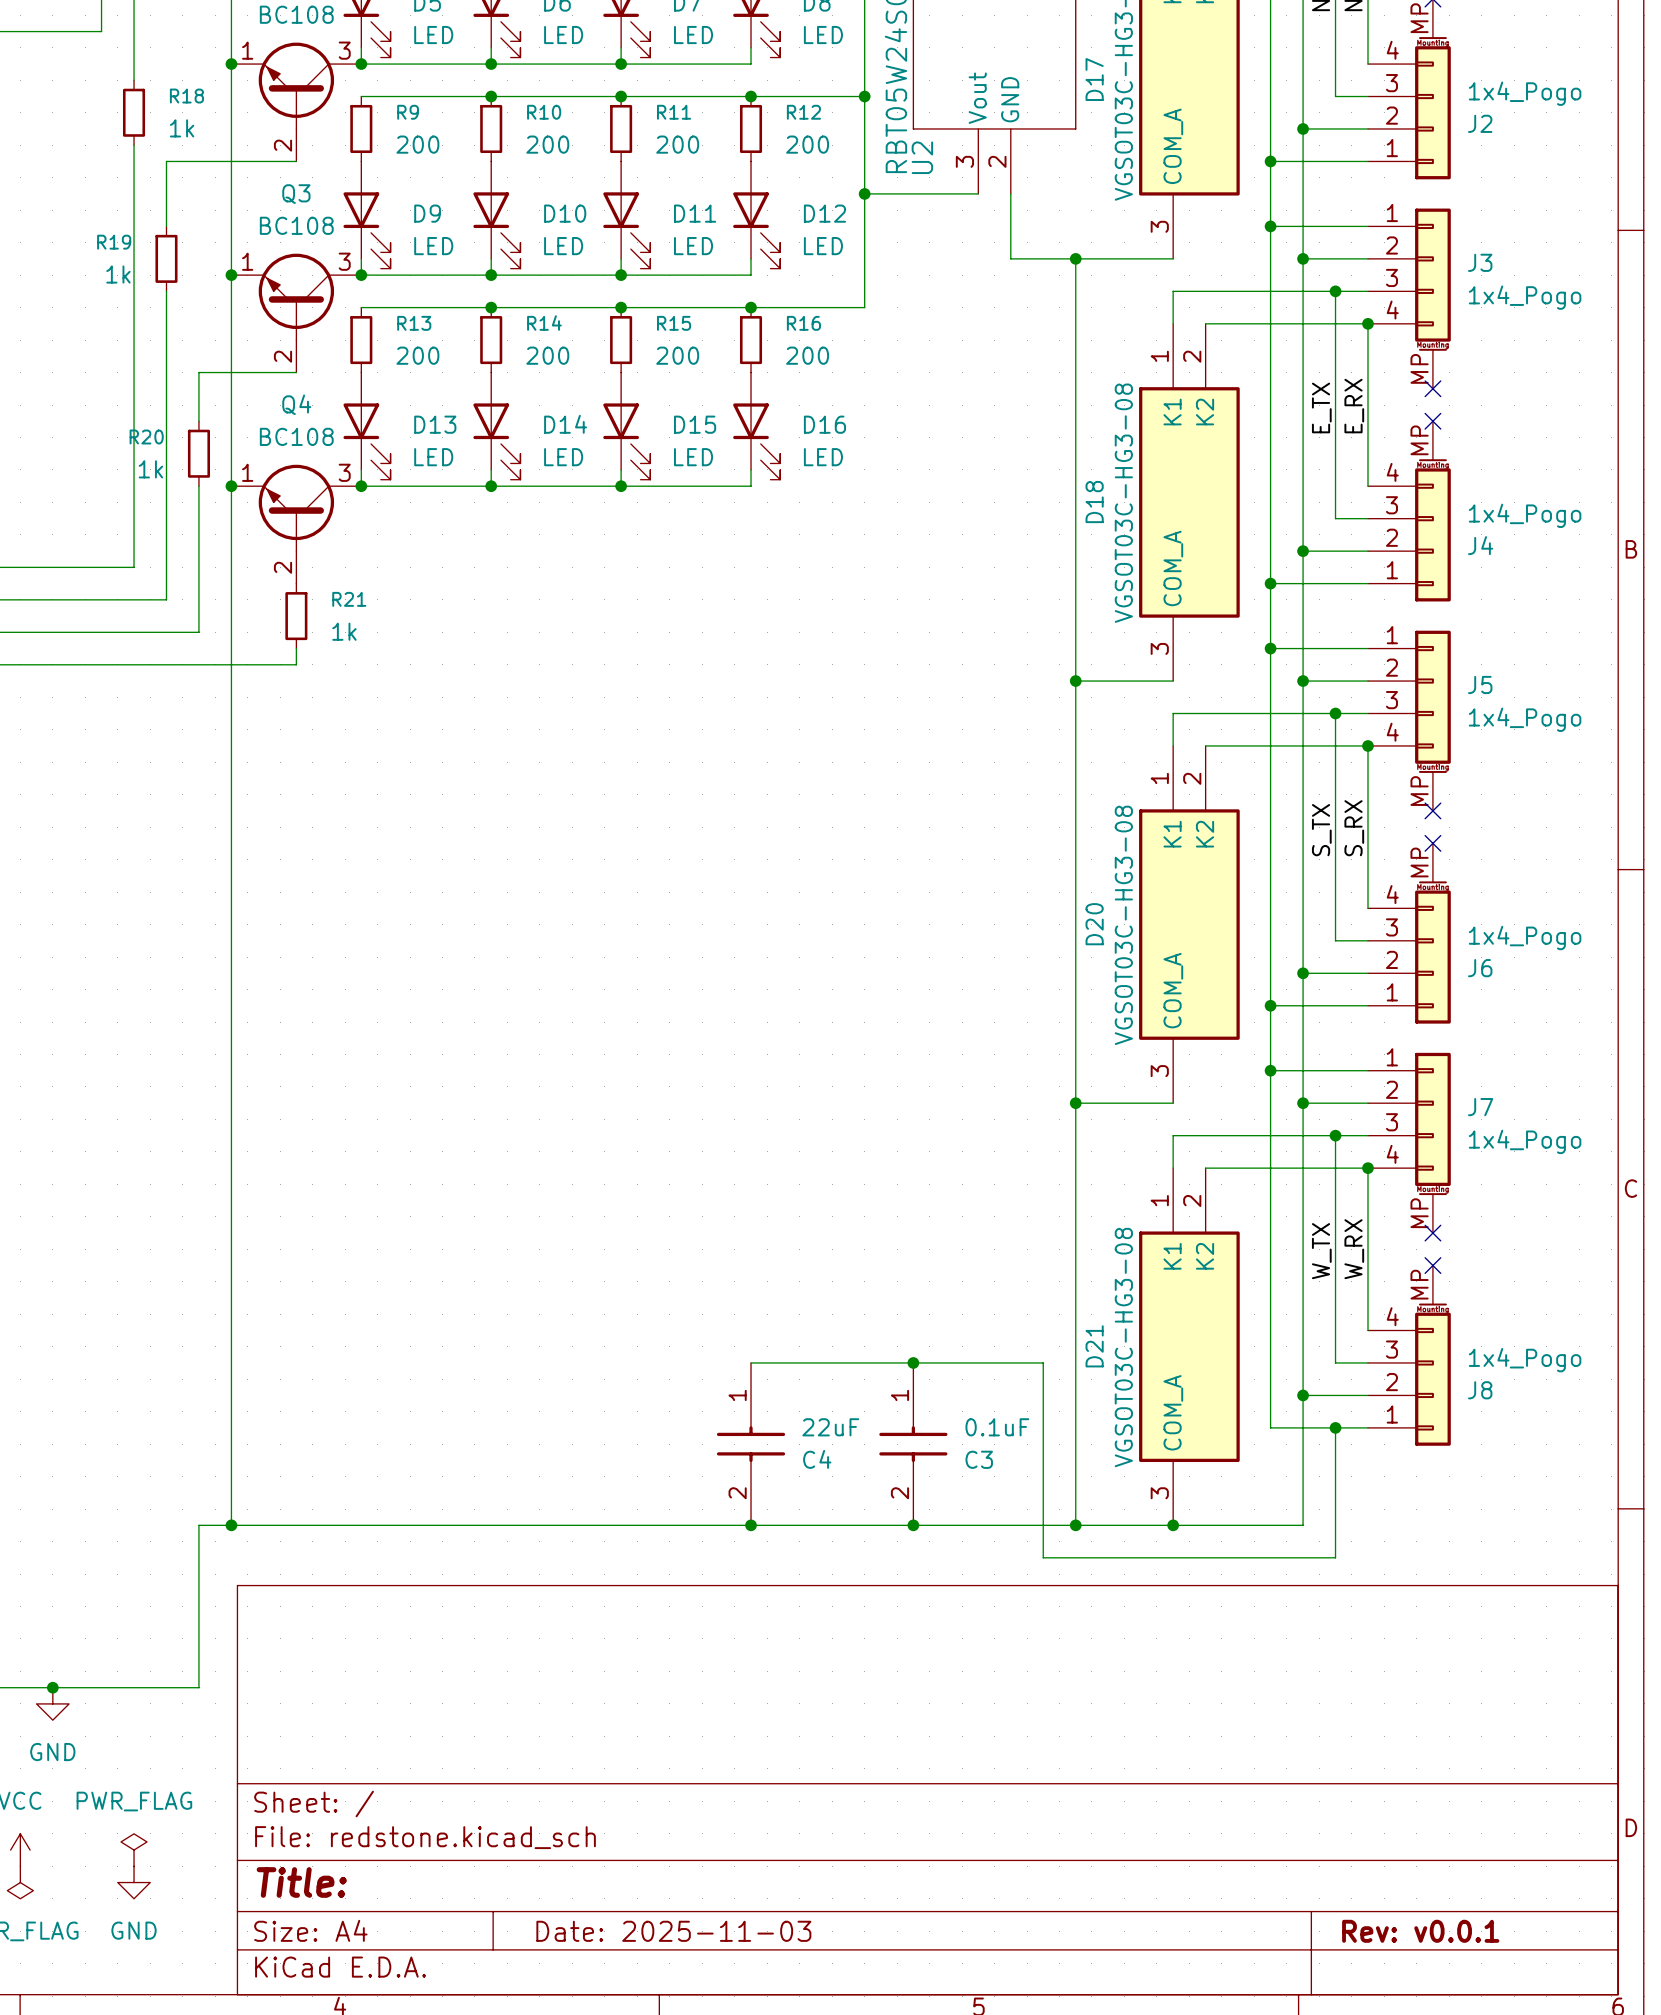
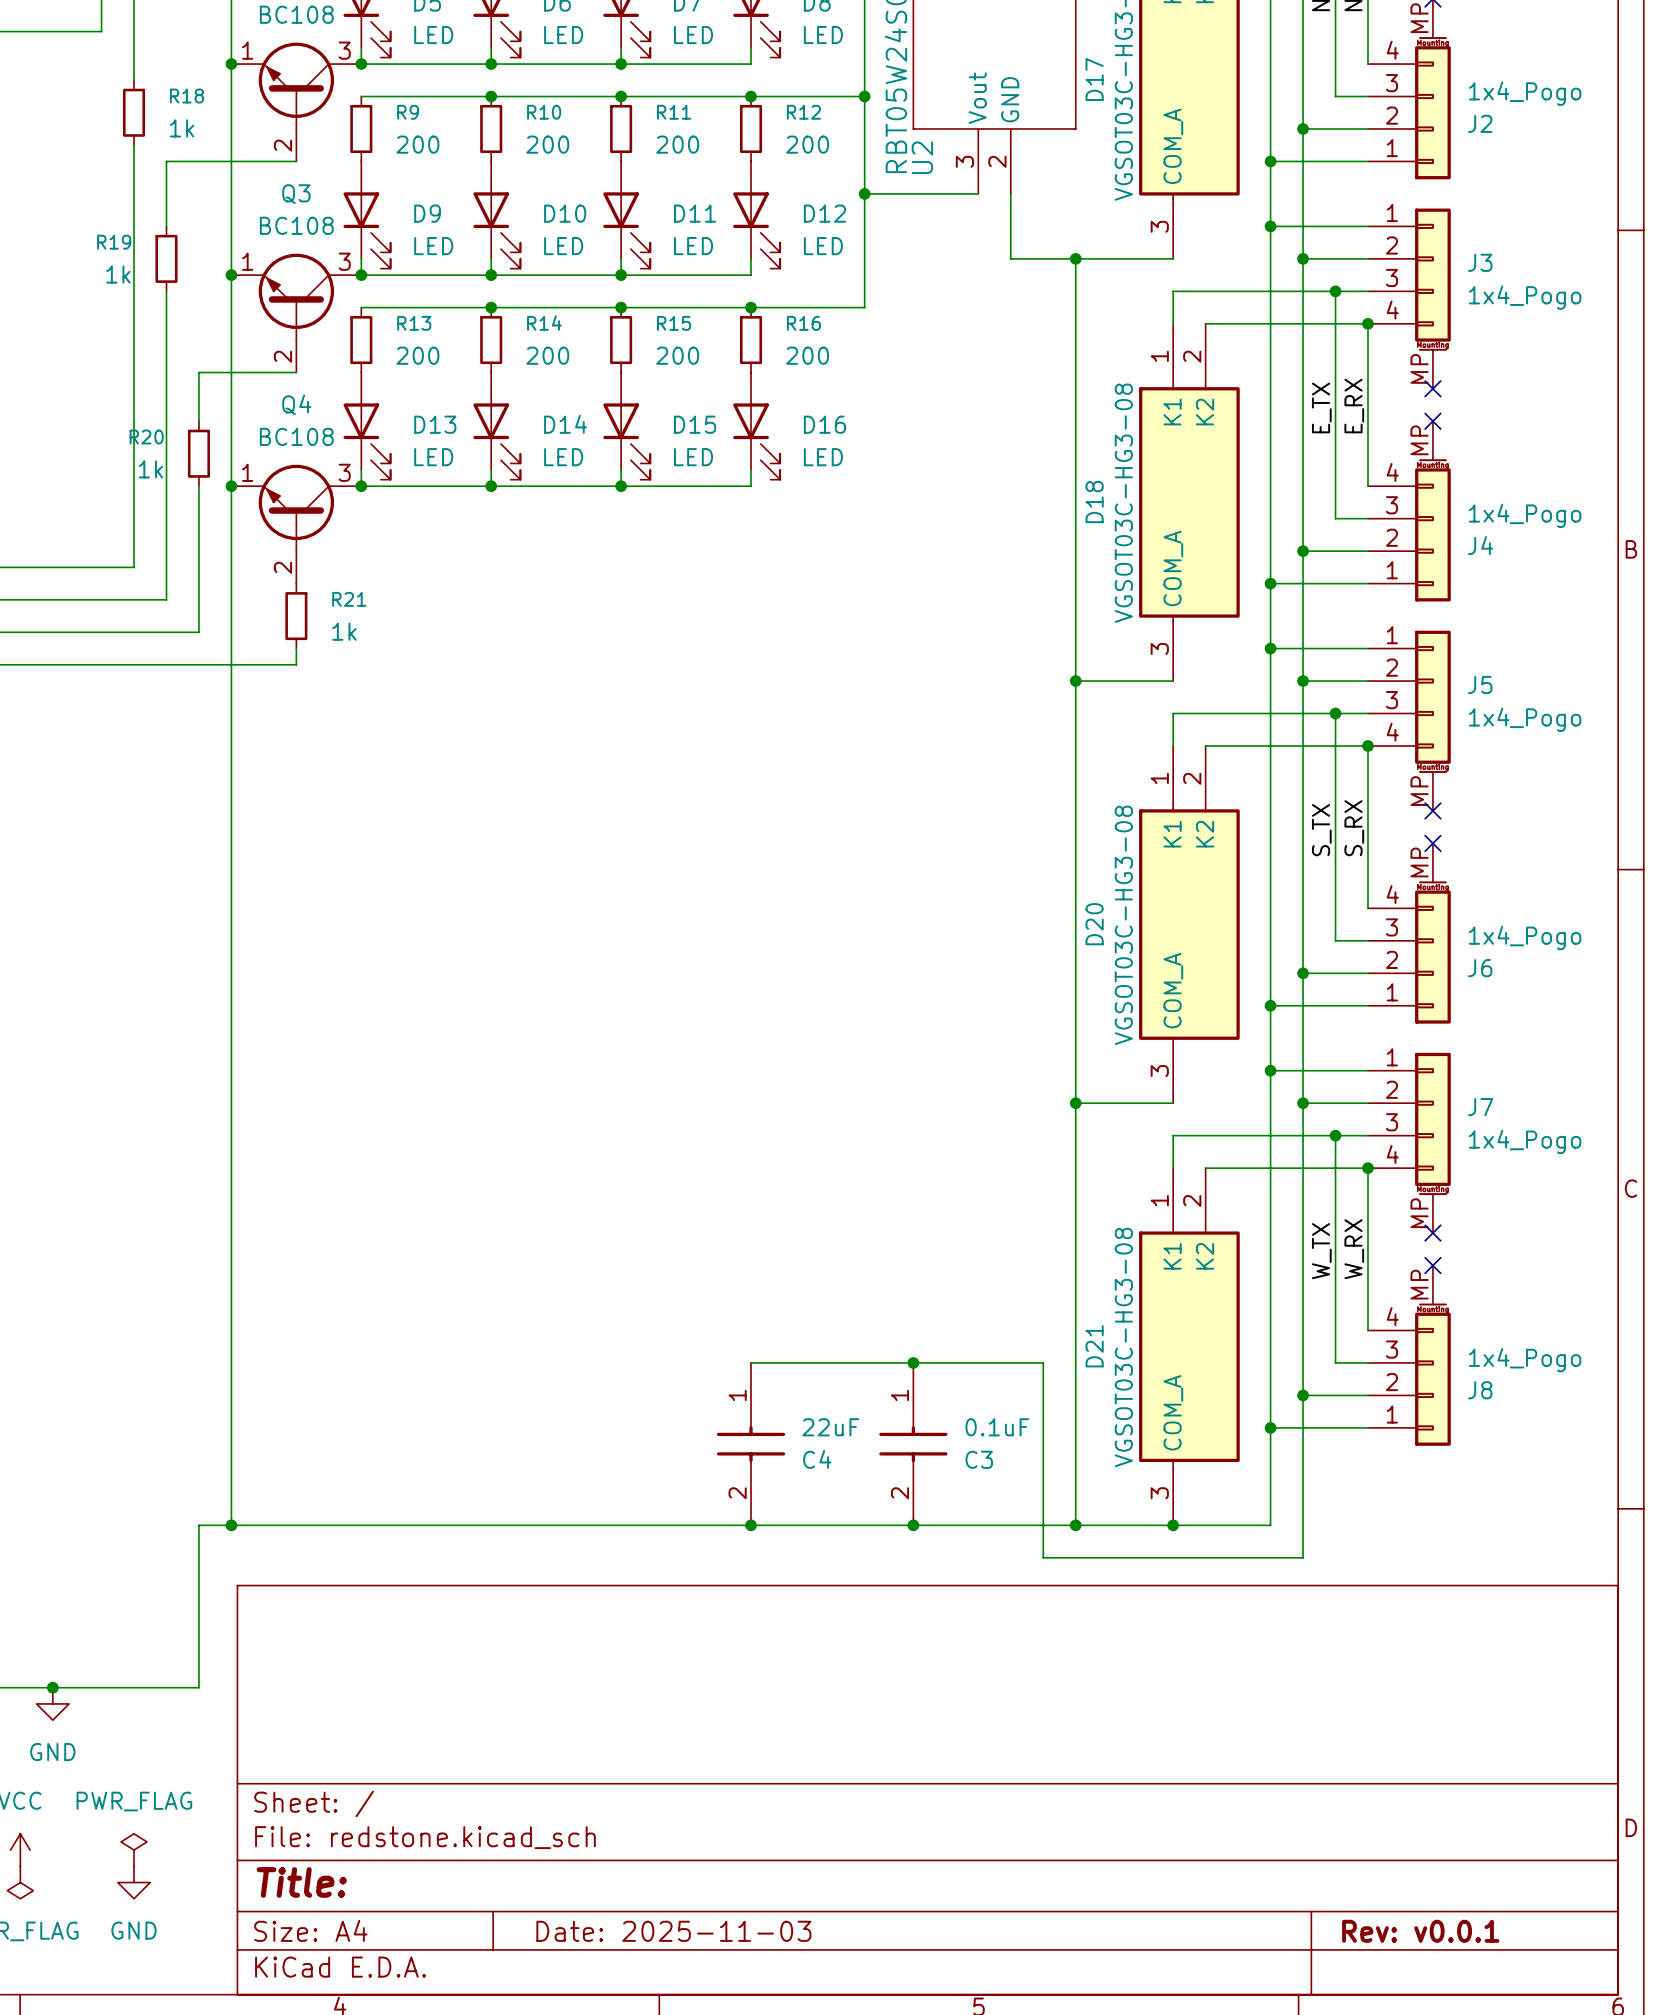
wire: none -> (1270, 1427) (1270, 1525)
wire: (1335, 1427) (1335, 1557) (1303, 1557) -> none
junction position: (1335, 1427) -> (1270, 1427)
wire: (1270, 1525) (1303, 1525) -> (1303, 1557) (1303, 1525)

